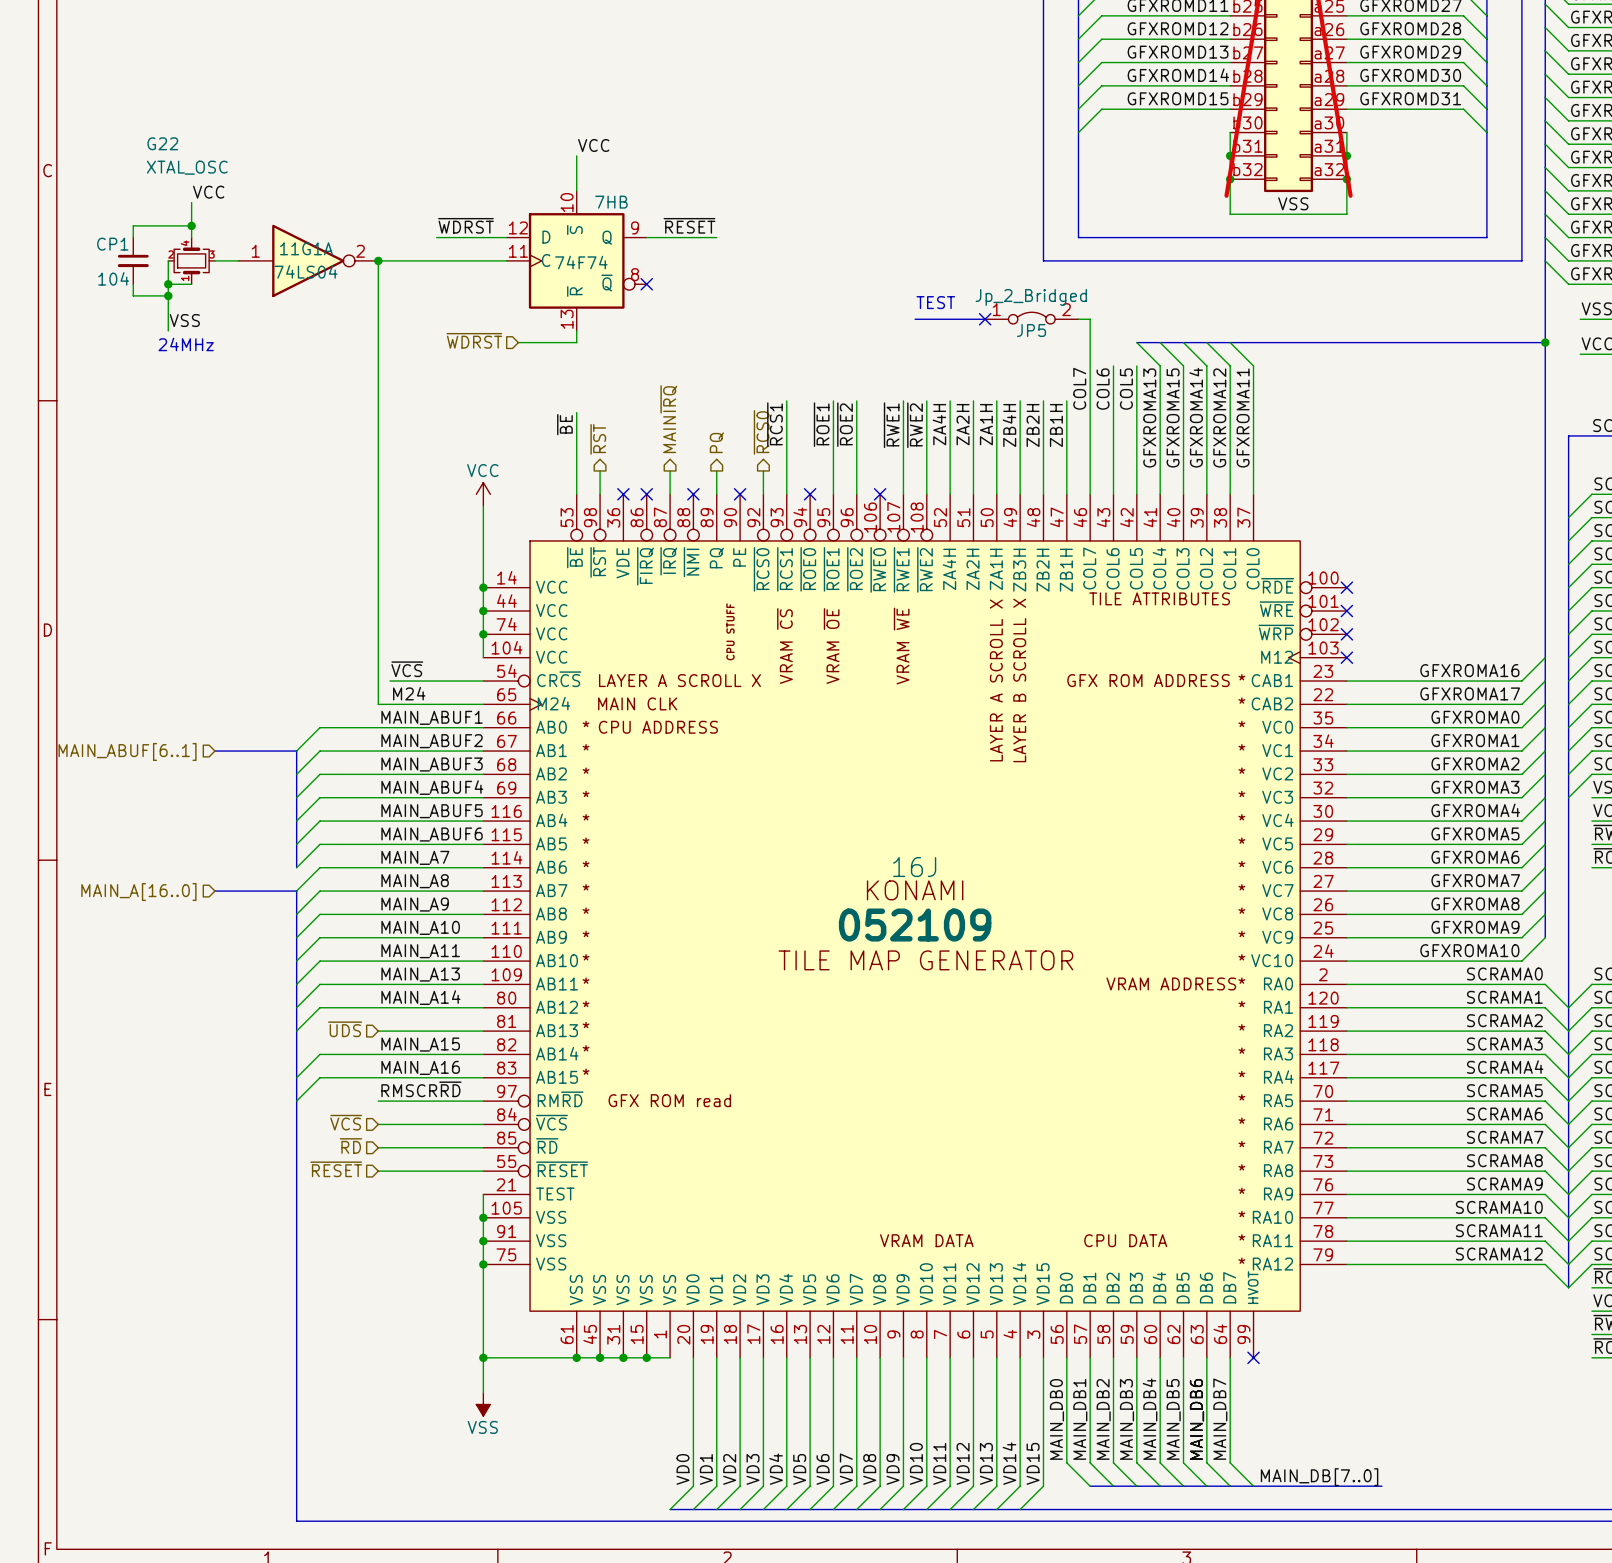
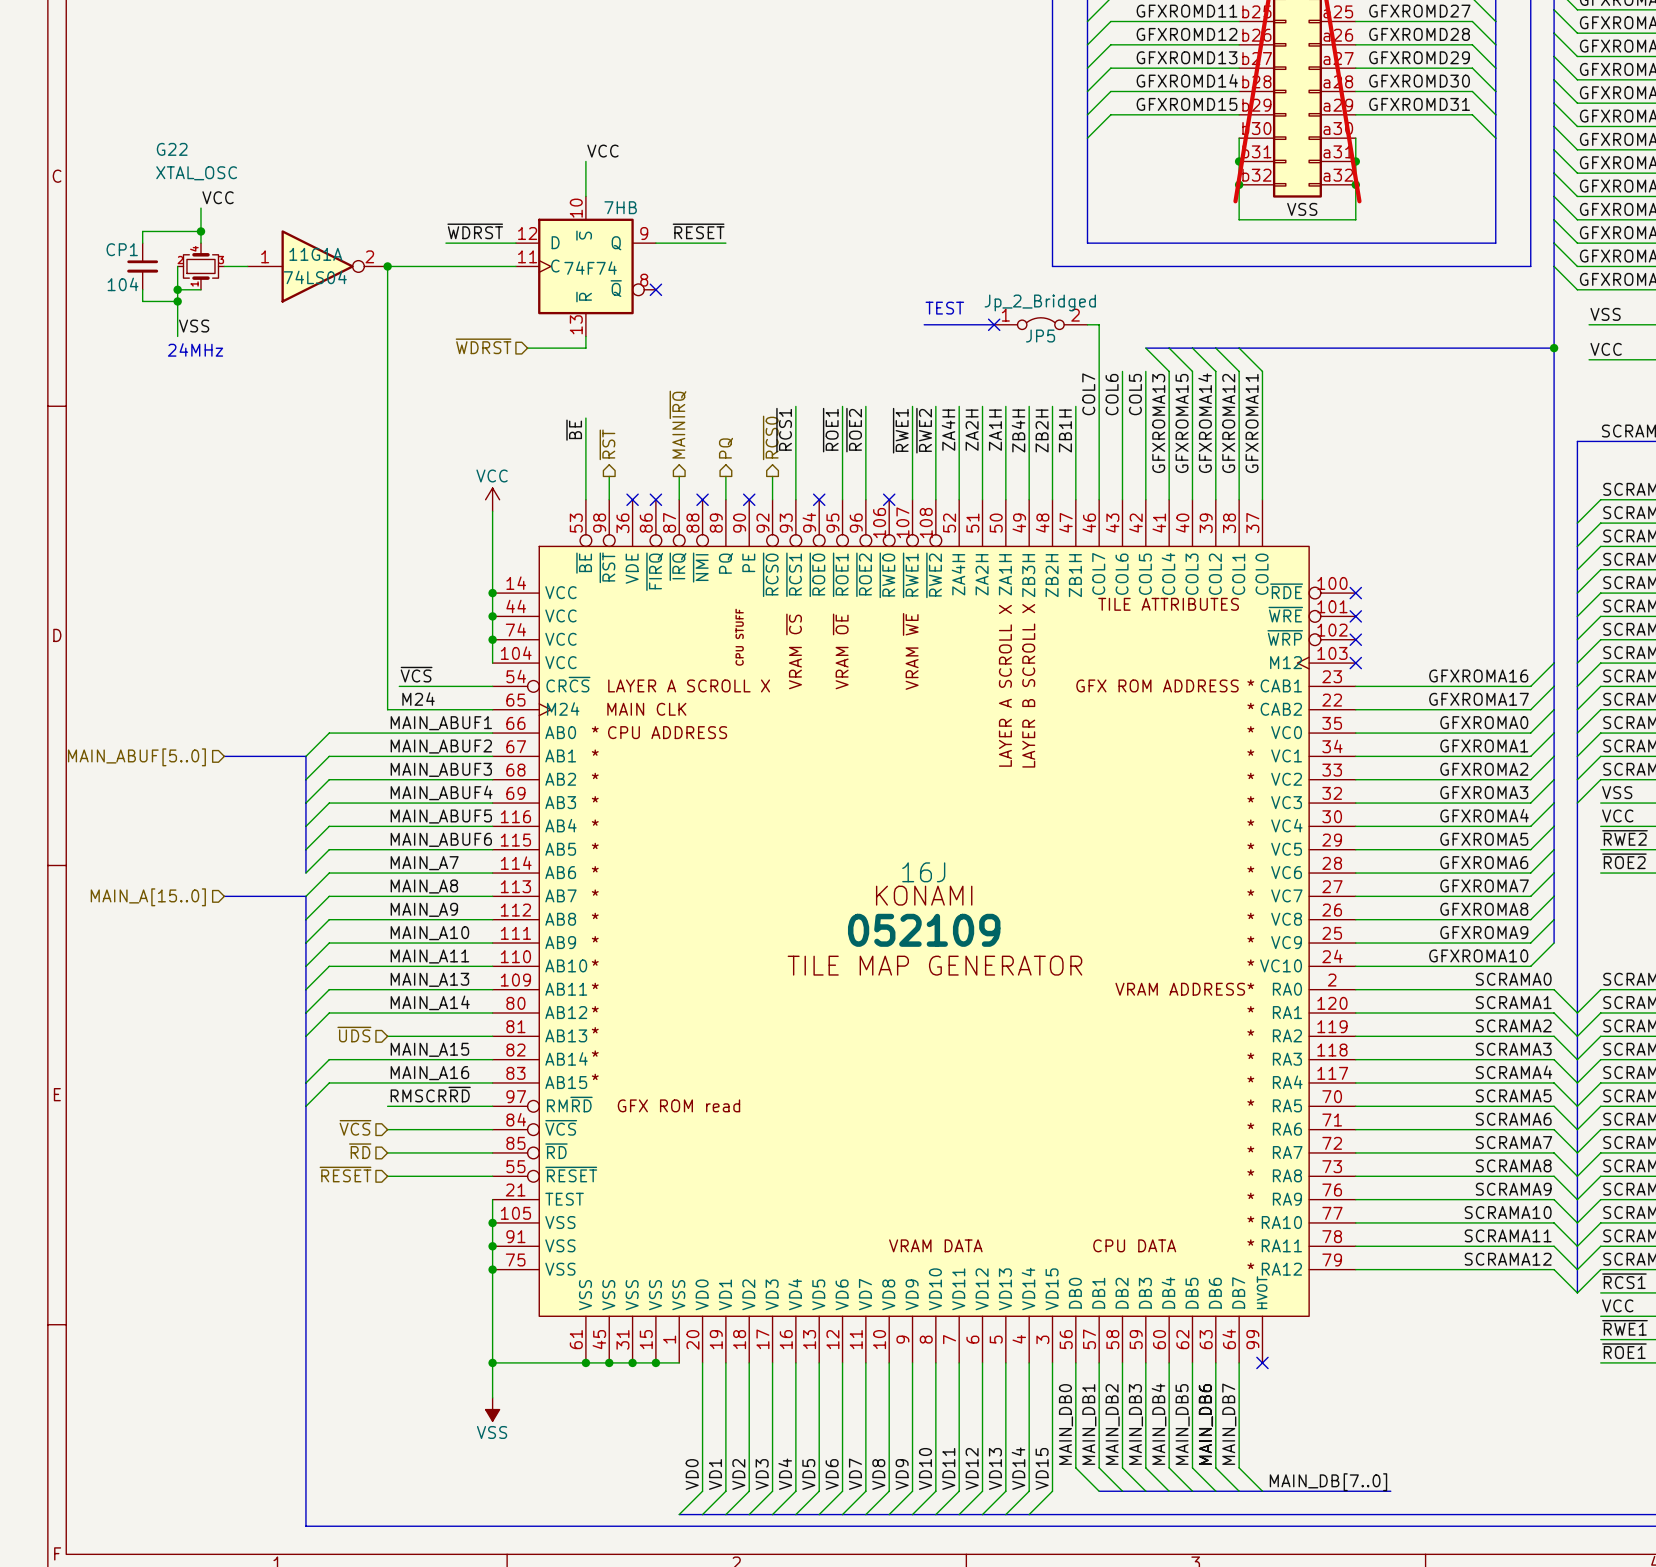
hierarchical label: MAIN_ABUF[6..1] (127, 751) -> MAIN_ABUF[5..0] (136, 757)
hierarchical label: MAIN_A[16..0] (138, 892) -> MAIN_A[15..0] (148, 897)

